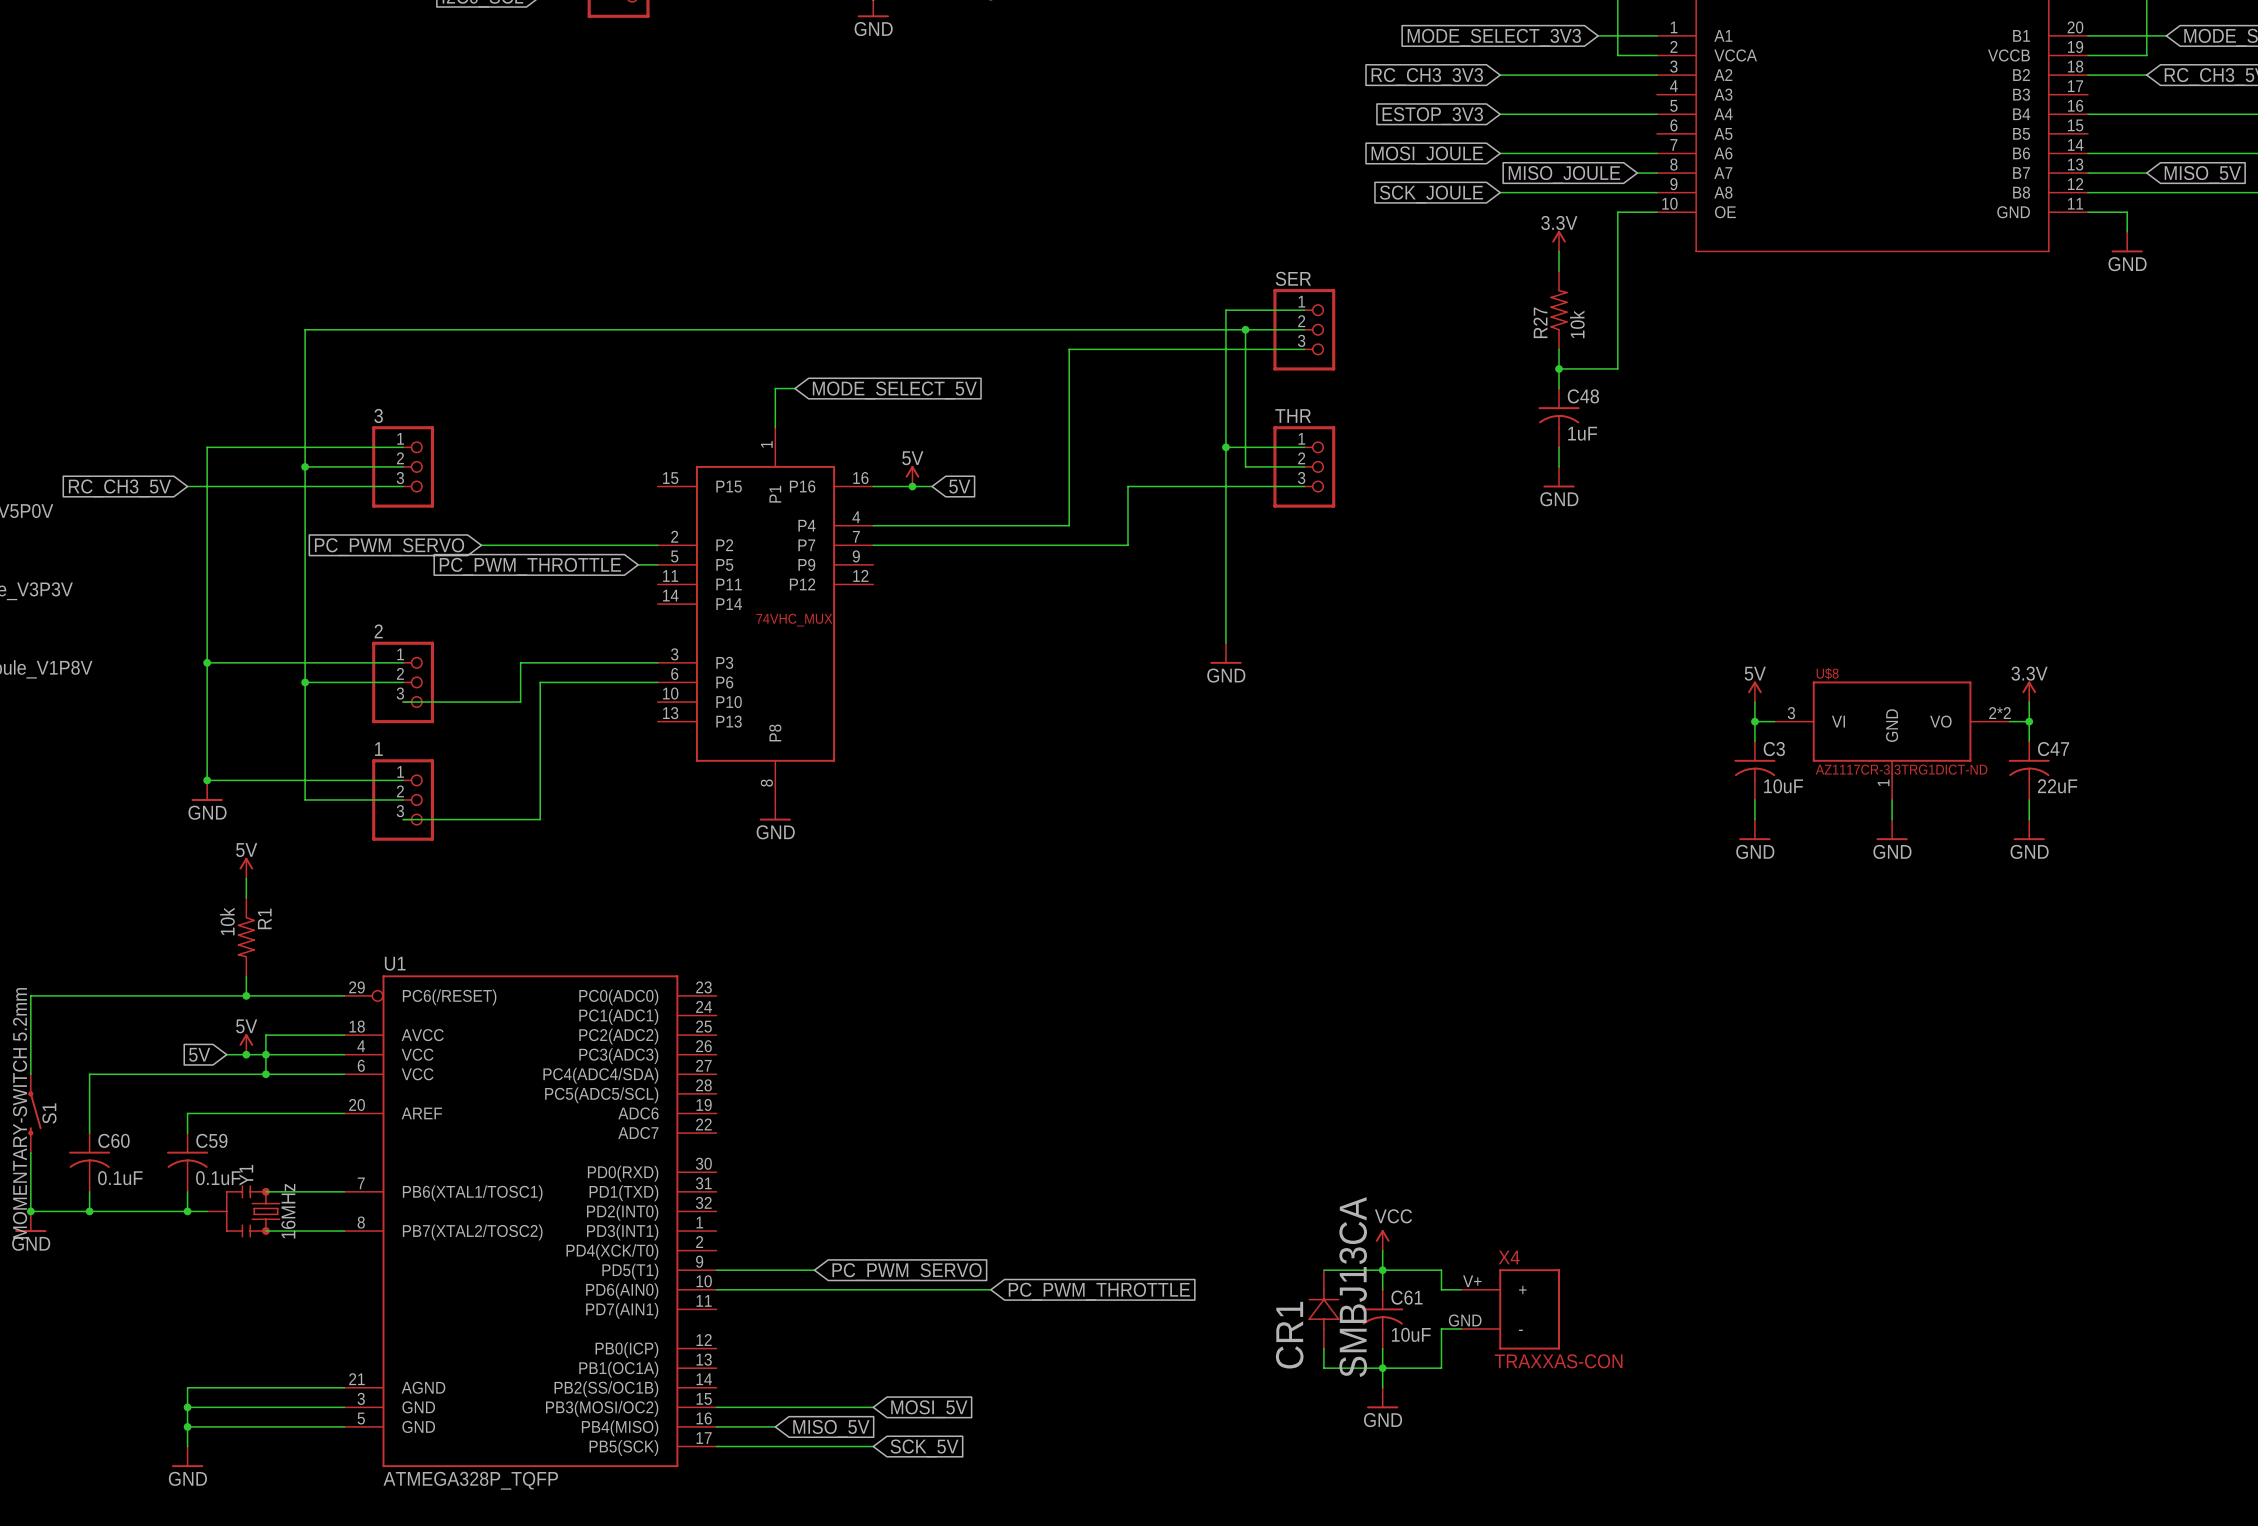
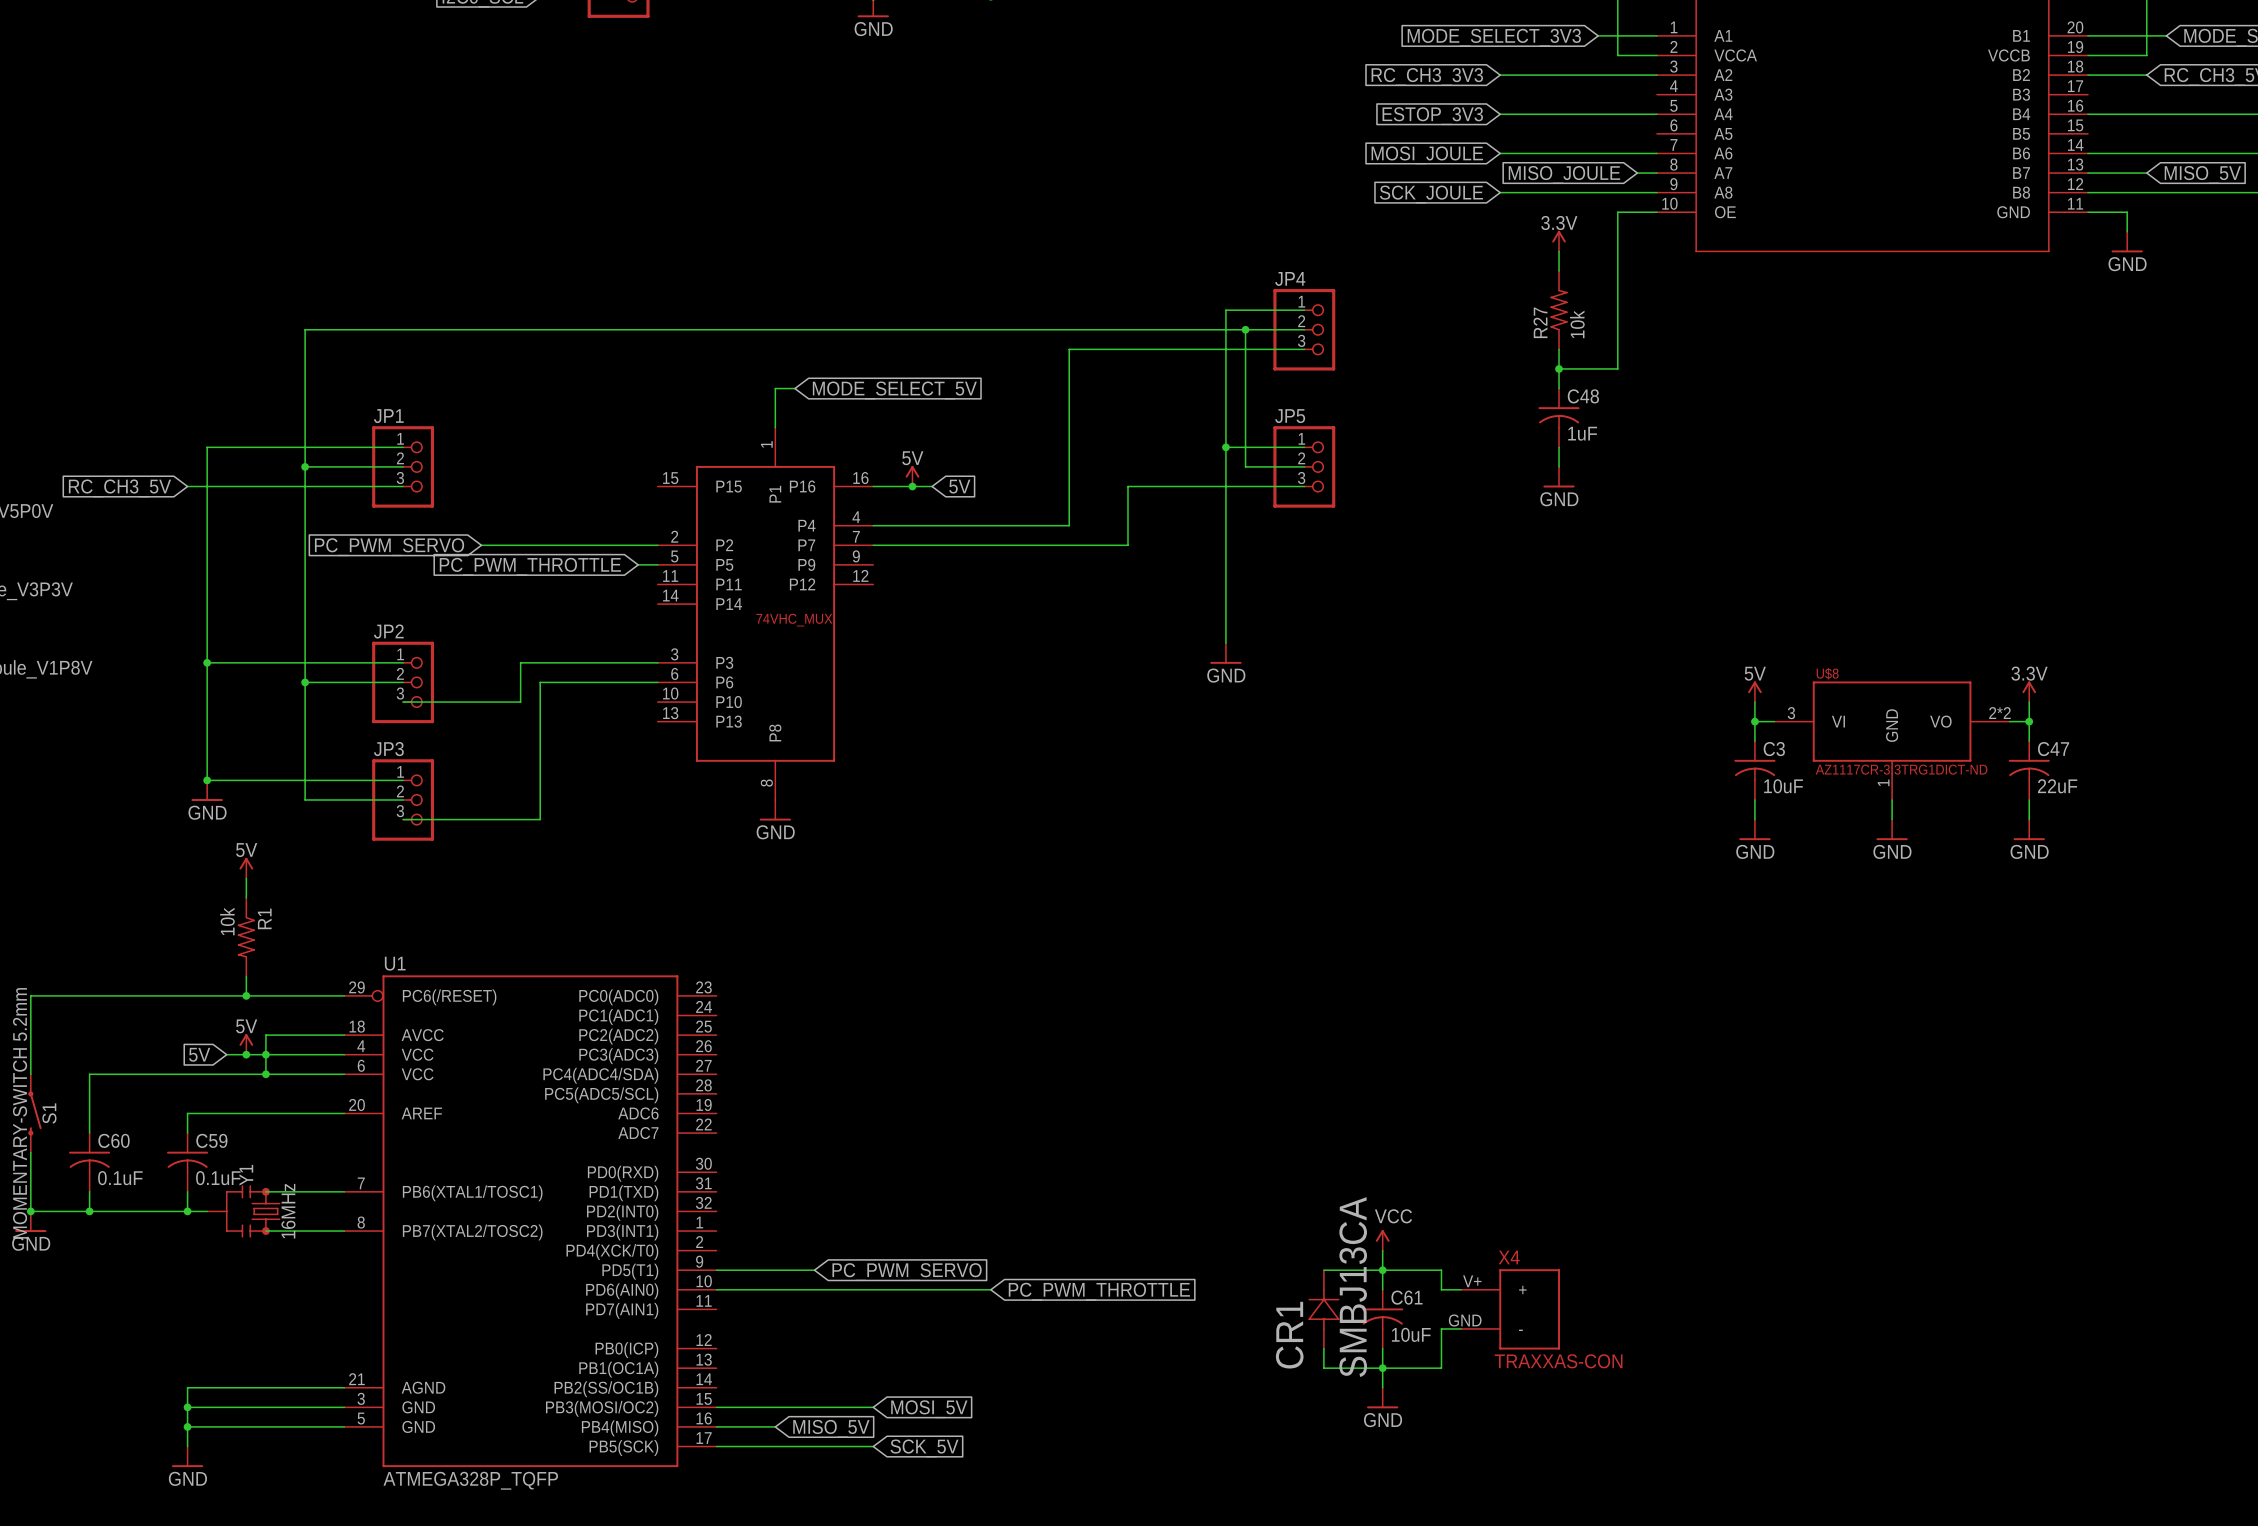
SER name: SER (1293, 278) -> JP4 (1290, 278)
3 name: 3 (378, 415) -> JP1 (388, 416)
THR name: THR (1293, 415) -> JP5 (1290, 416)
2 name: 2 (378, 631) -> JP2 (388, 631)
1 name: 1 (378, 749) -> JP3 (388, 749)

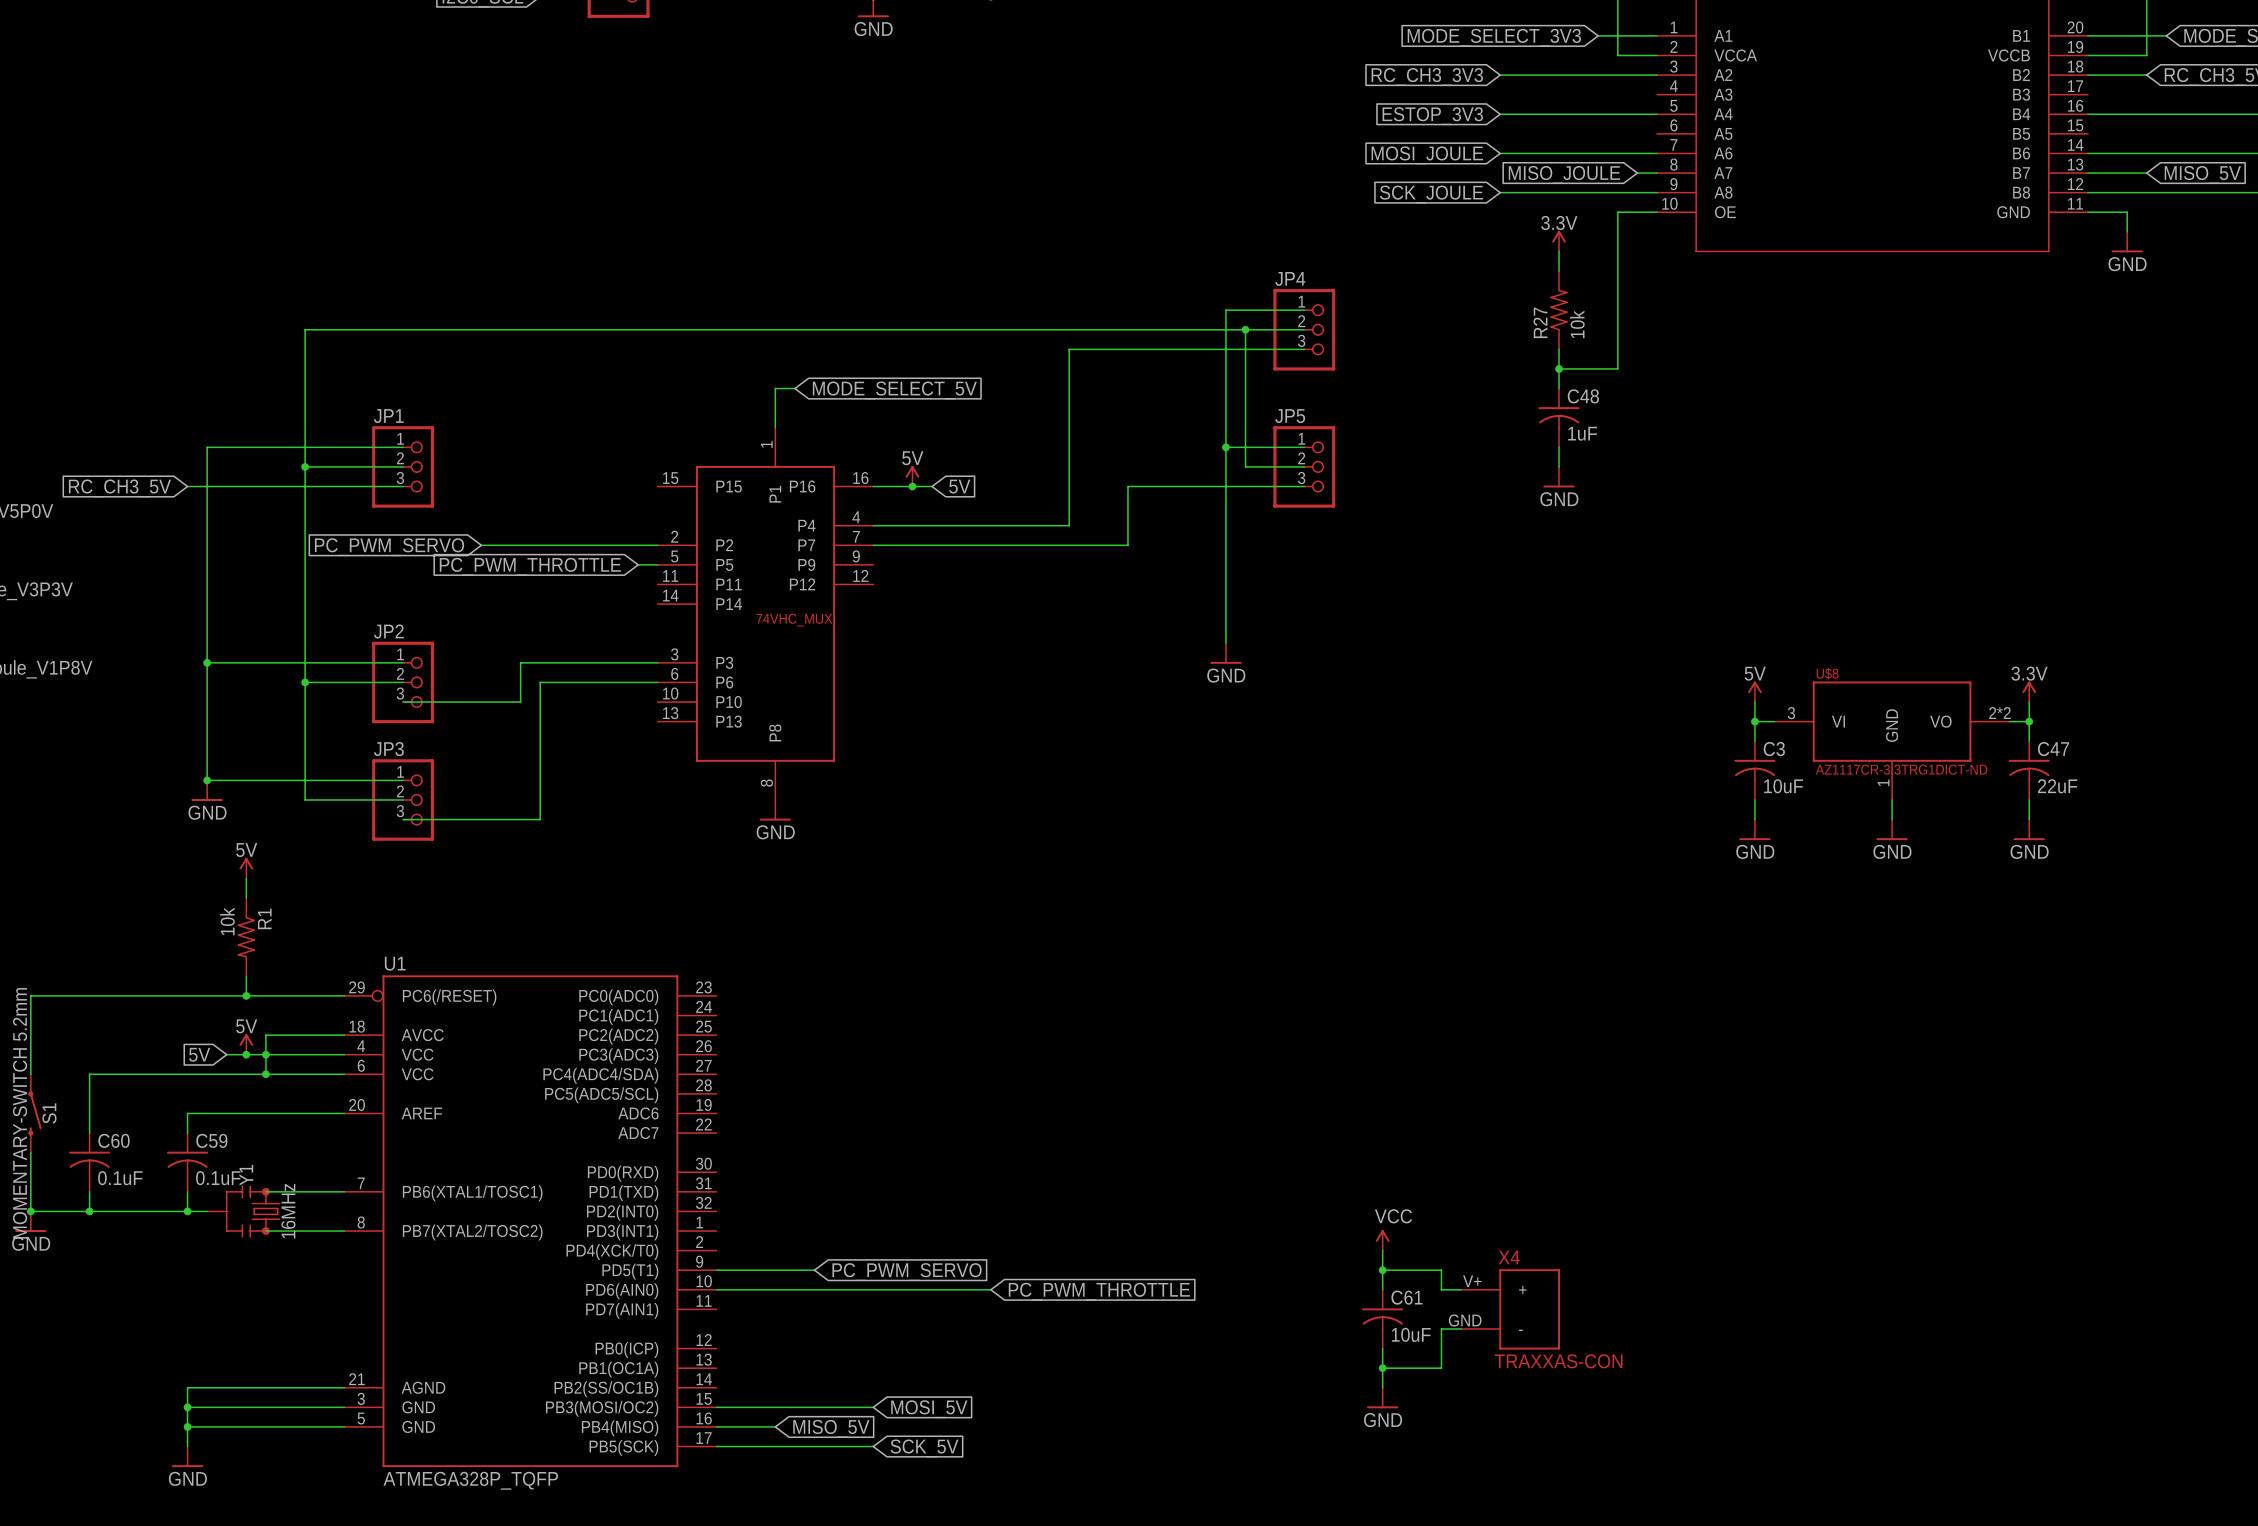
wire: (1323, 1270) (1382, 1270) -> none
CR1: SMBJ13CA (1323, 1309) -> none
wire: (1323, 1348) (1323, 1368) (1382, 1368) -> none

